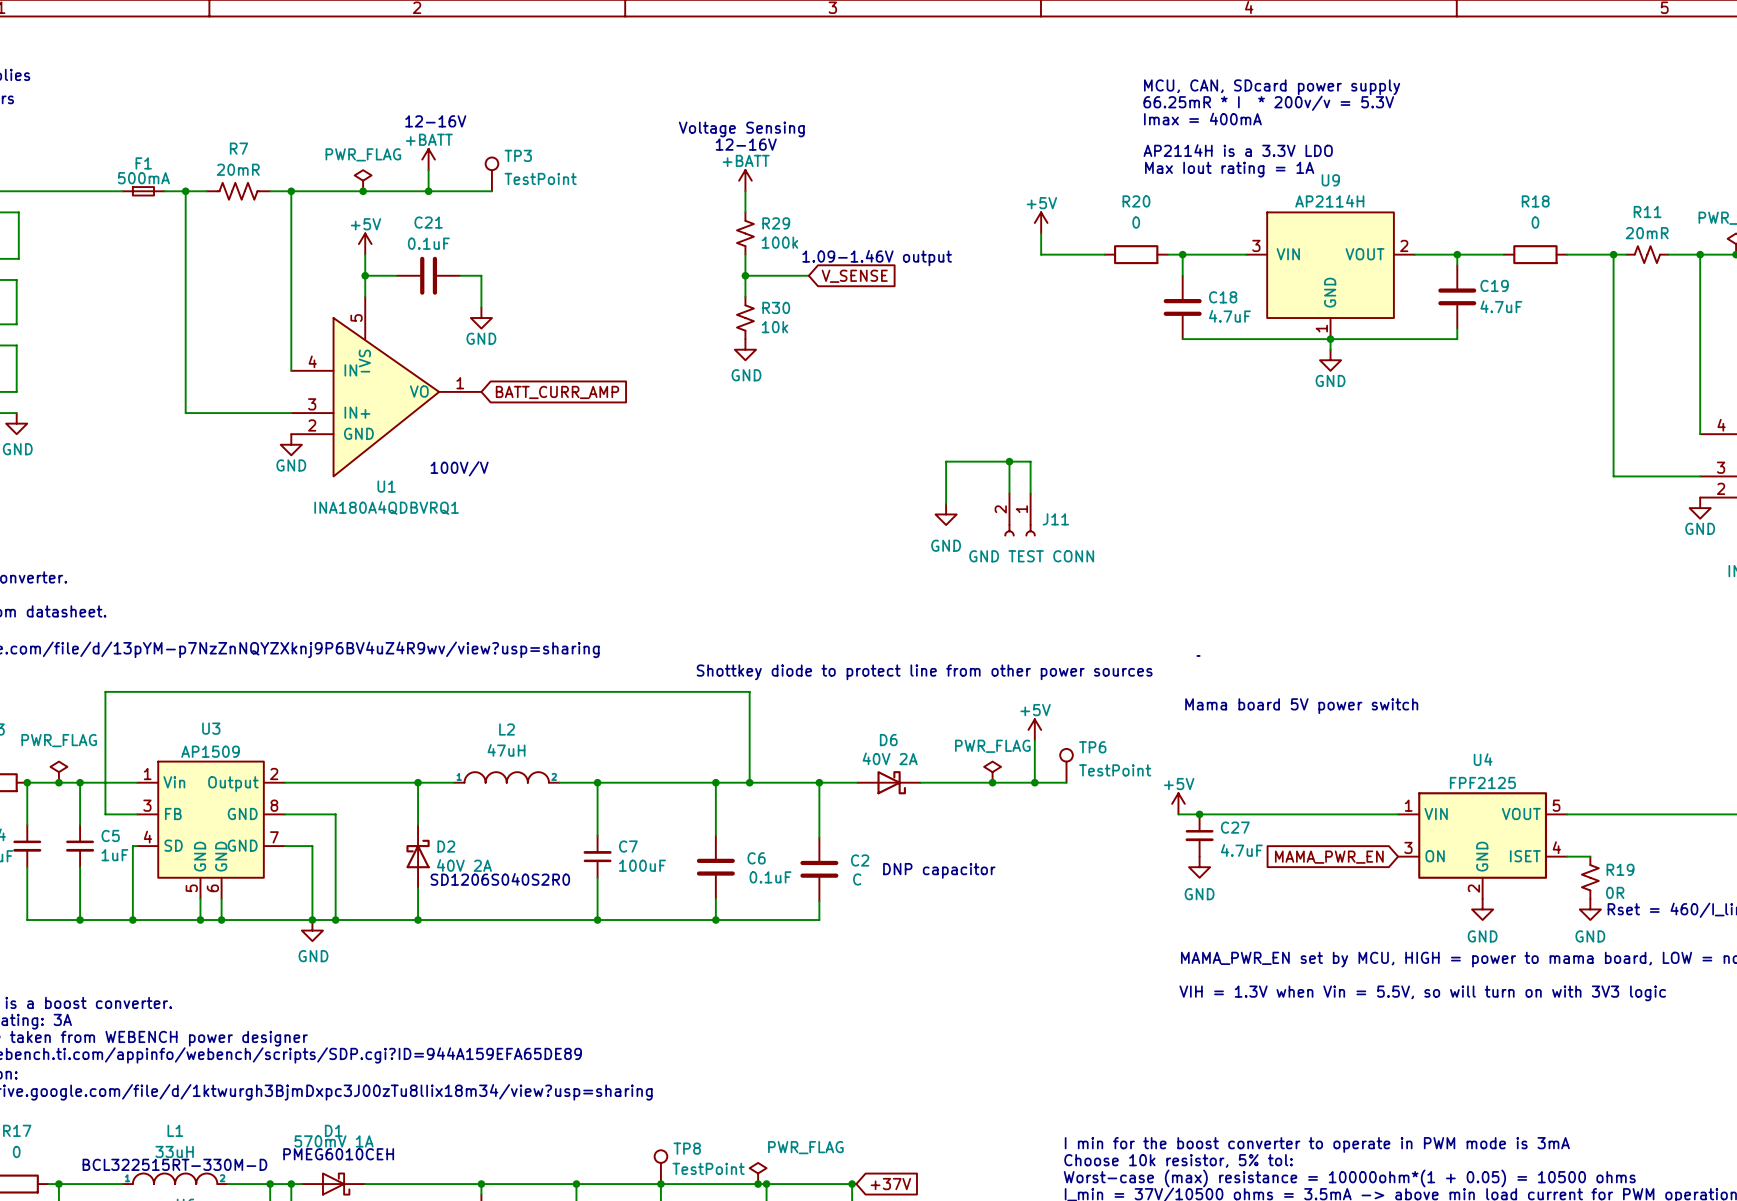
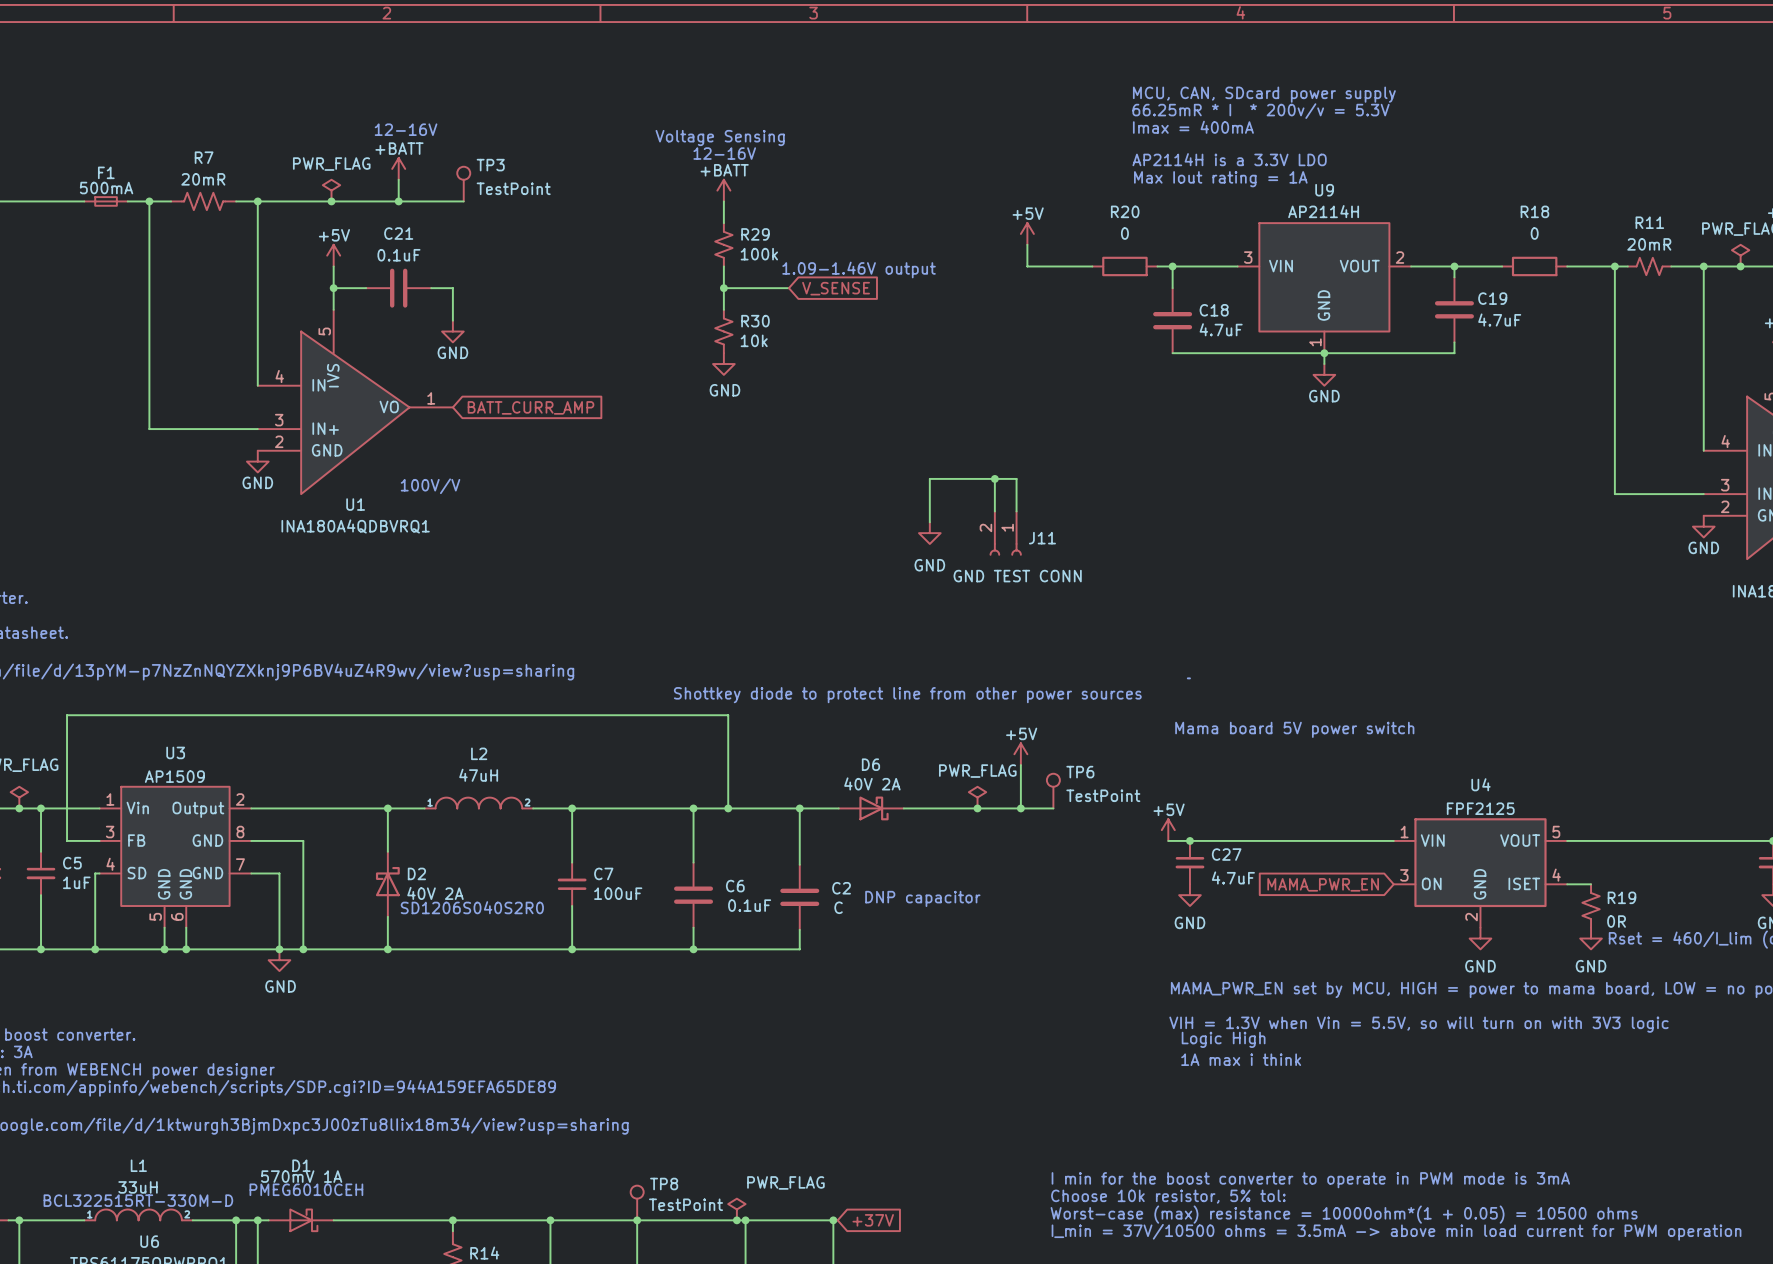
text: none -> Logic High (1223, 1039)
text: none -> 1A max i think (1241, 1059)

